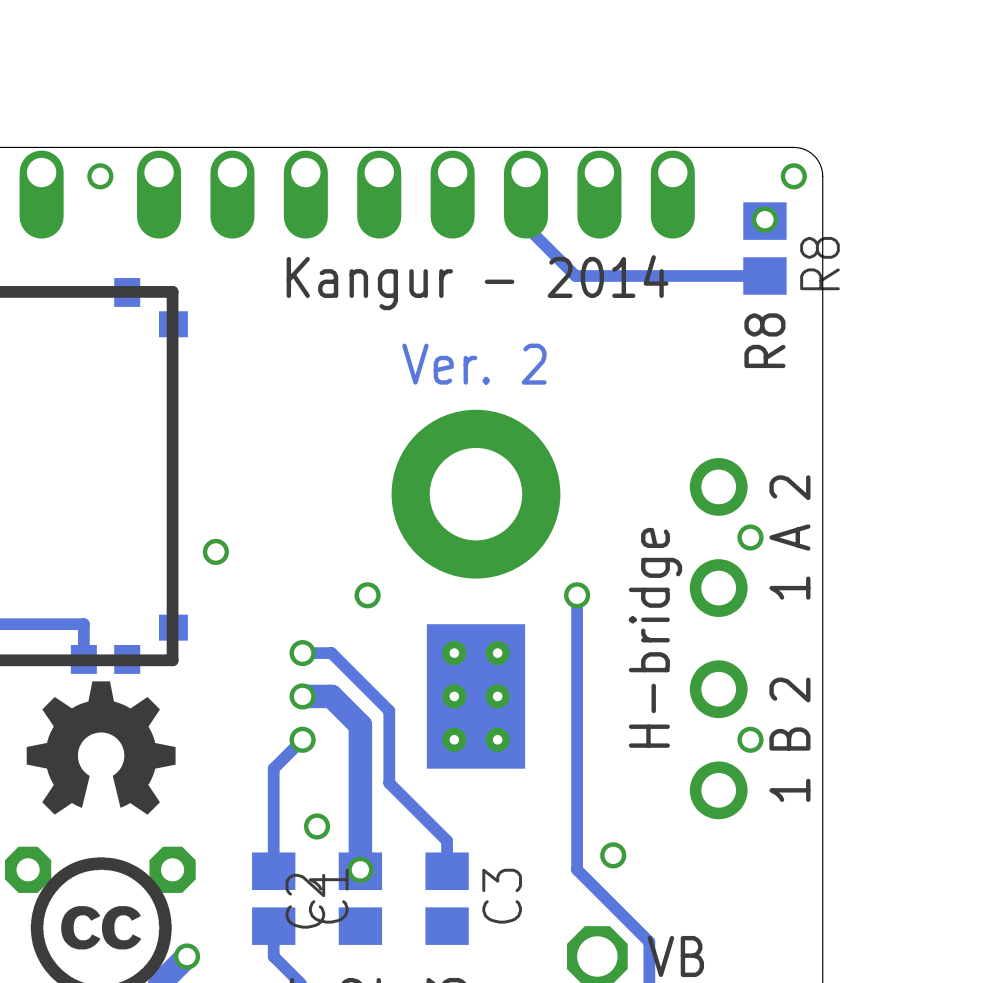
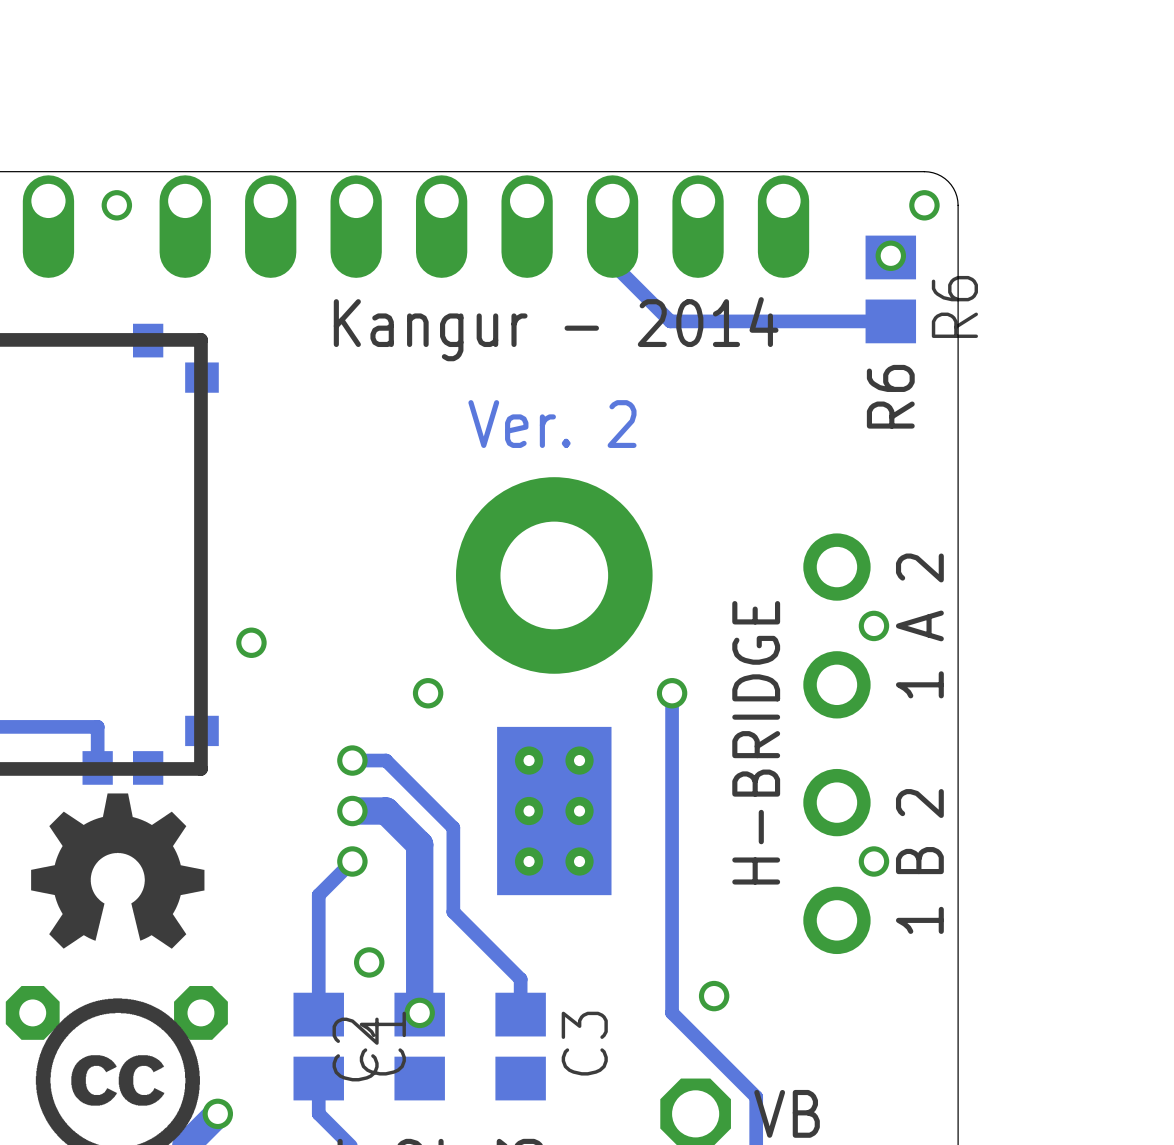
R8 name: R8 (819, 263) -> R6 (954, 306)
text: R8 (764, 340) -> R6 (890, 396)
text: H-bridge (655, 637) -> H-BRIDGE (756, 742)

